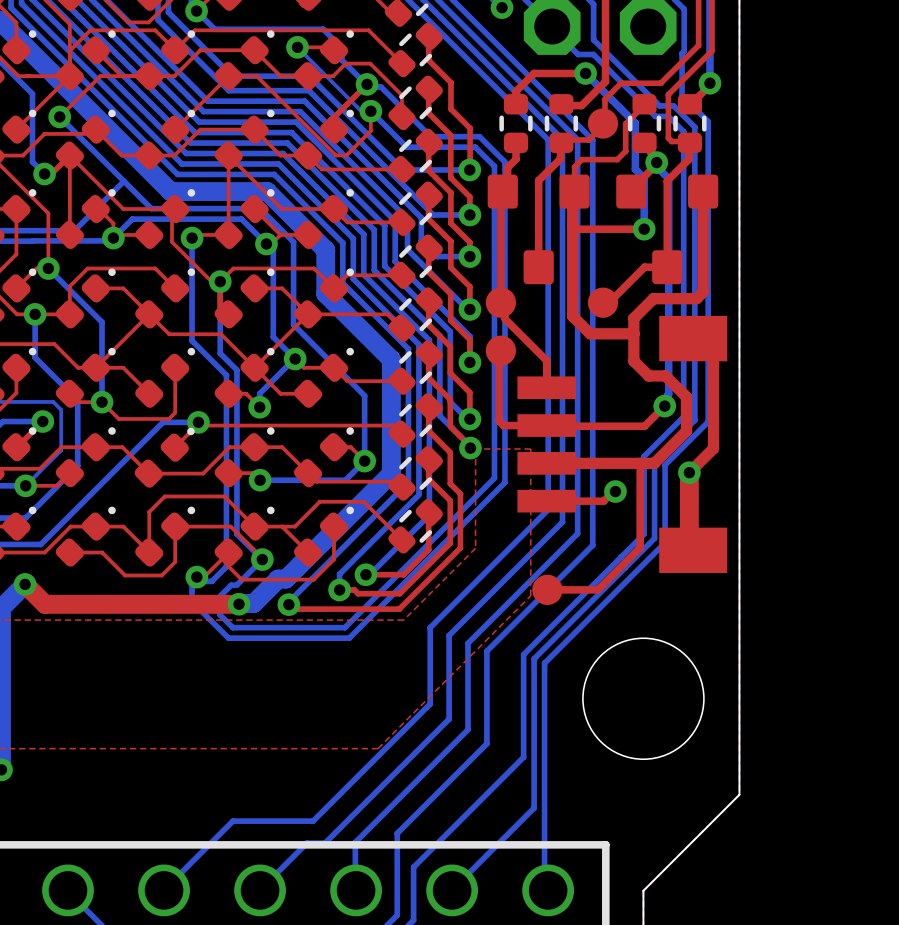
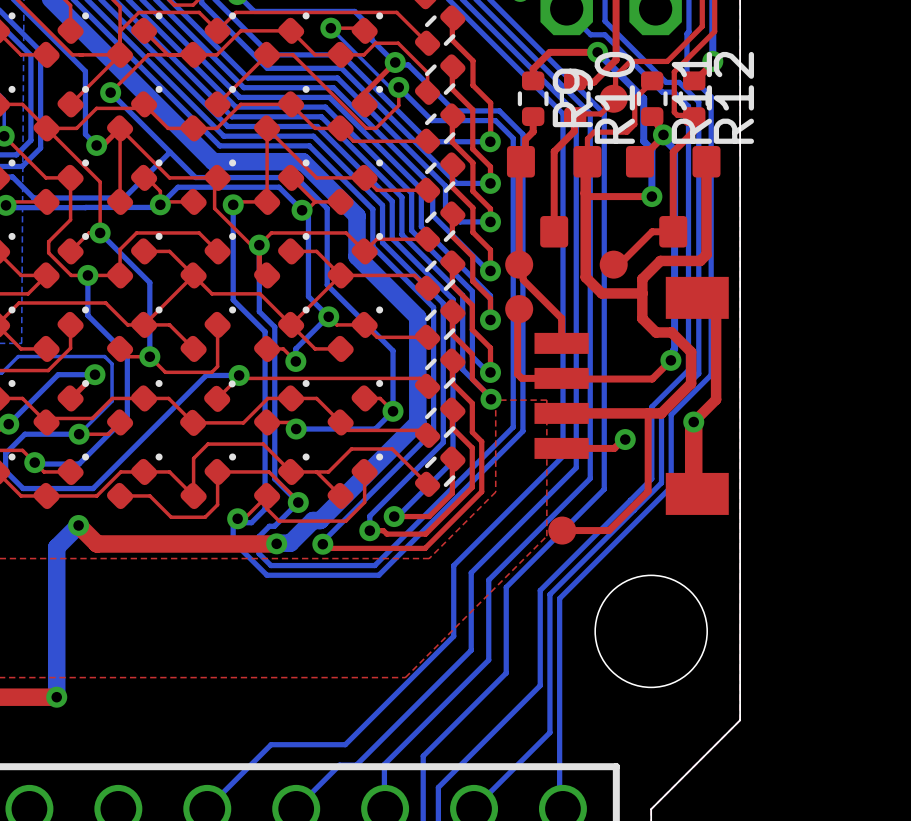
R9 name: none -> R9 (572, 97)
R10 name: none -> R10 (614, 97)
R11 name: none -> R11 (691, 97)
R12 name: none -> R12 (733, 97)

